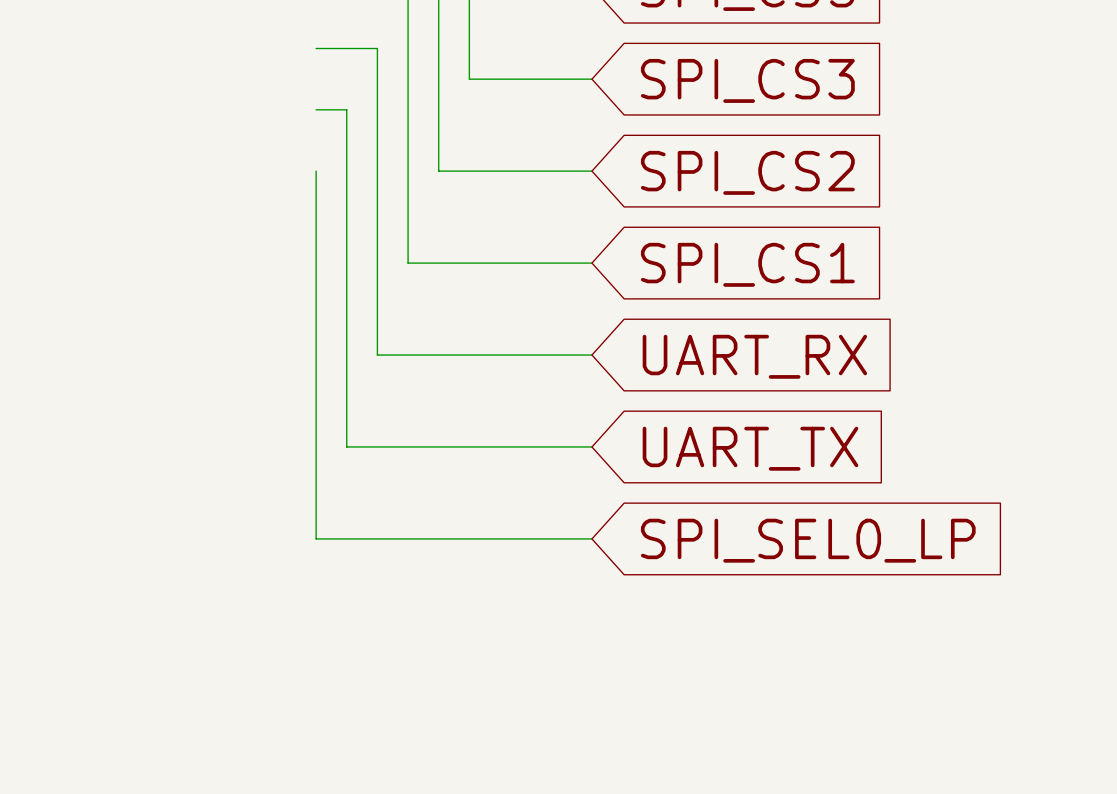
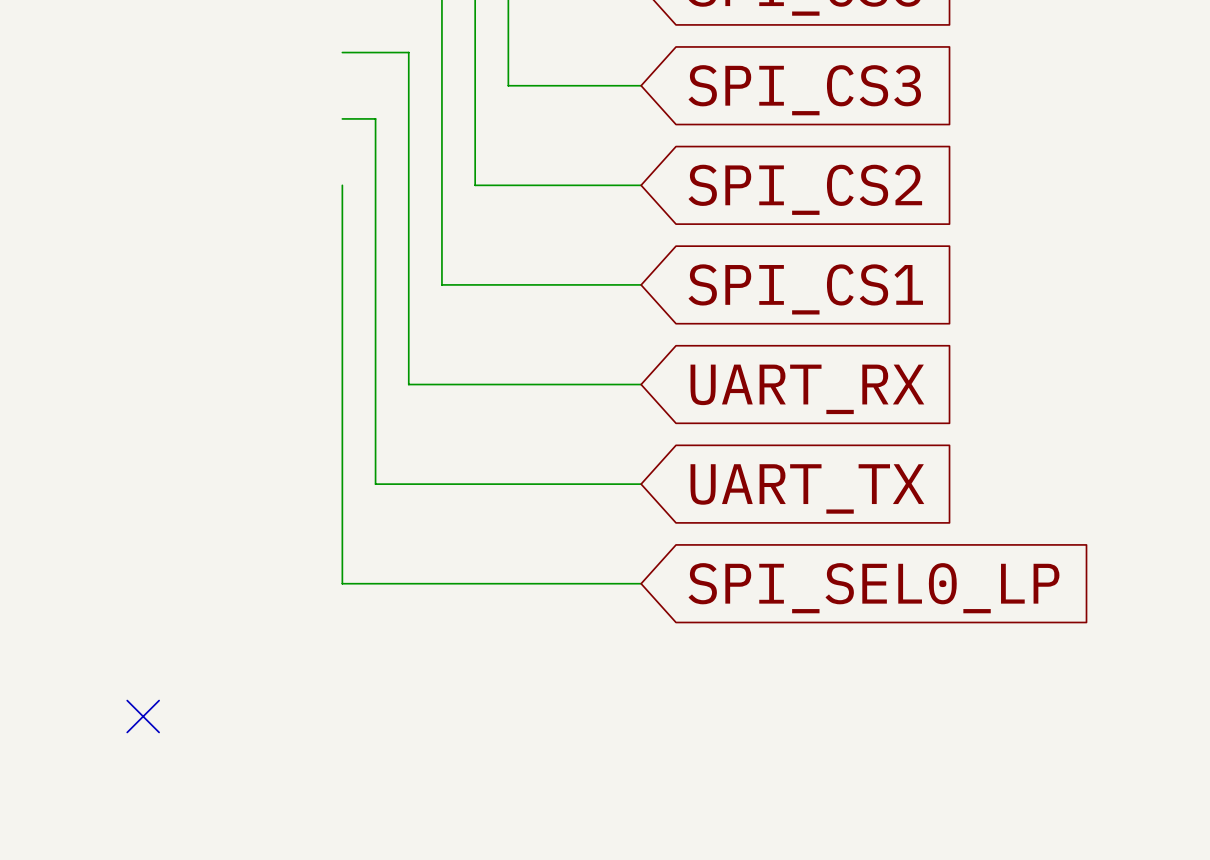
no-connect mark: none -> (143, 716)

